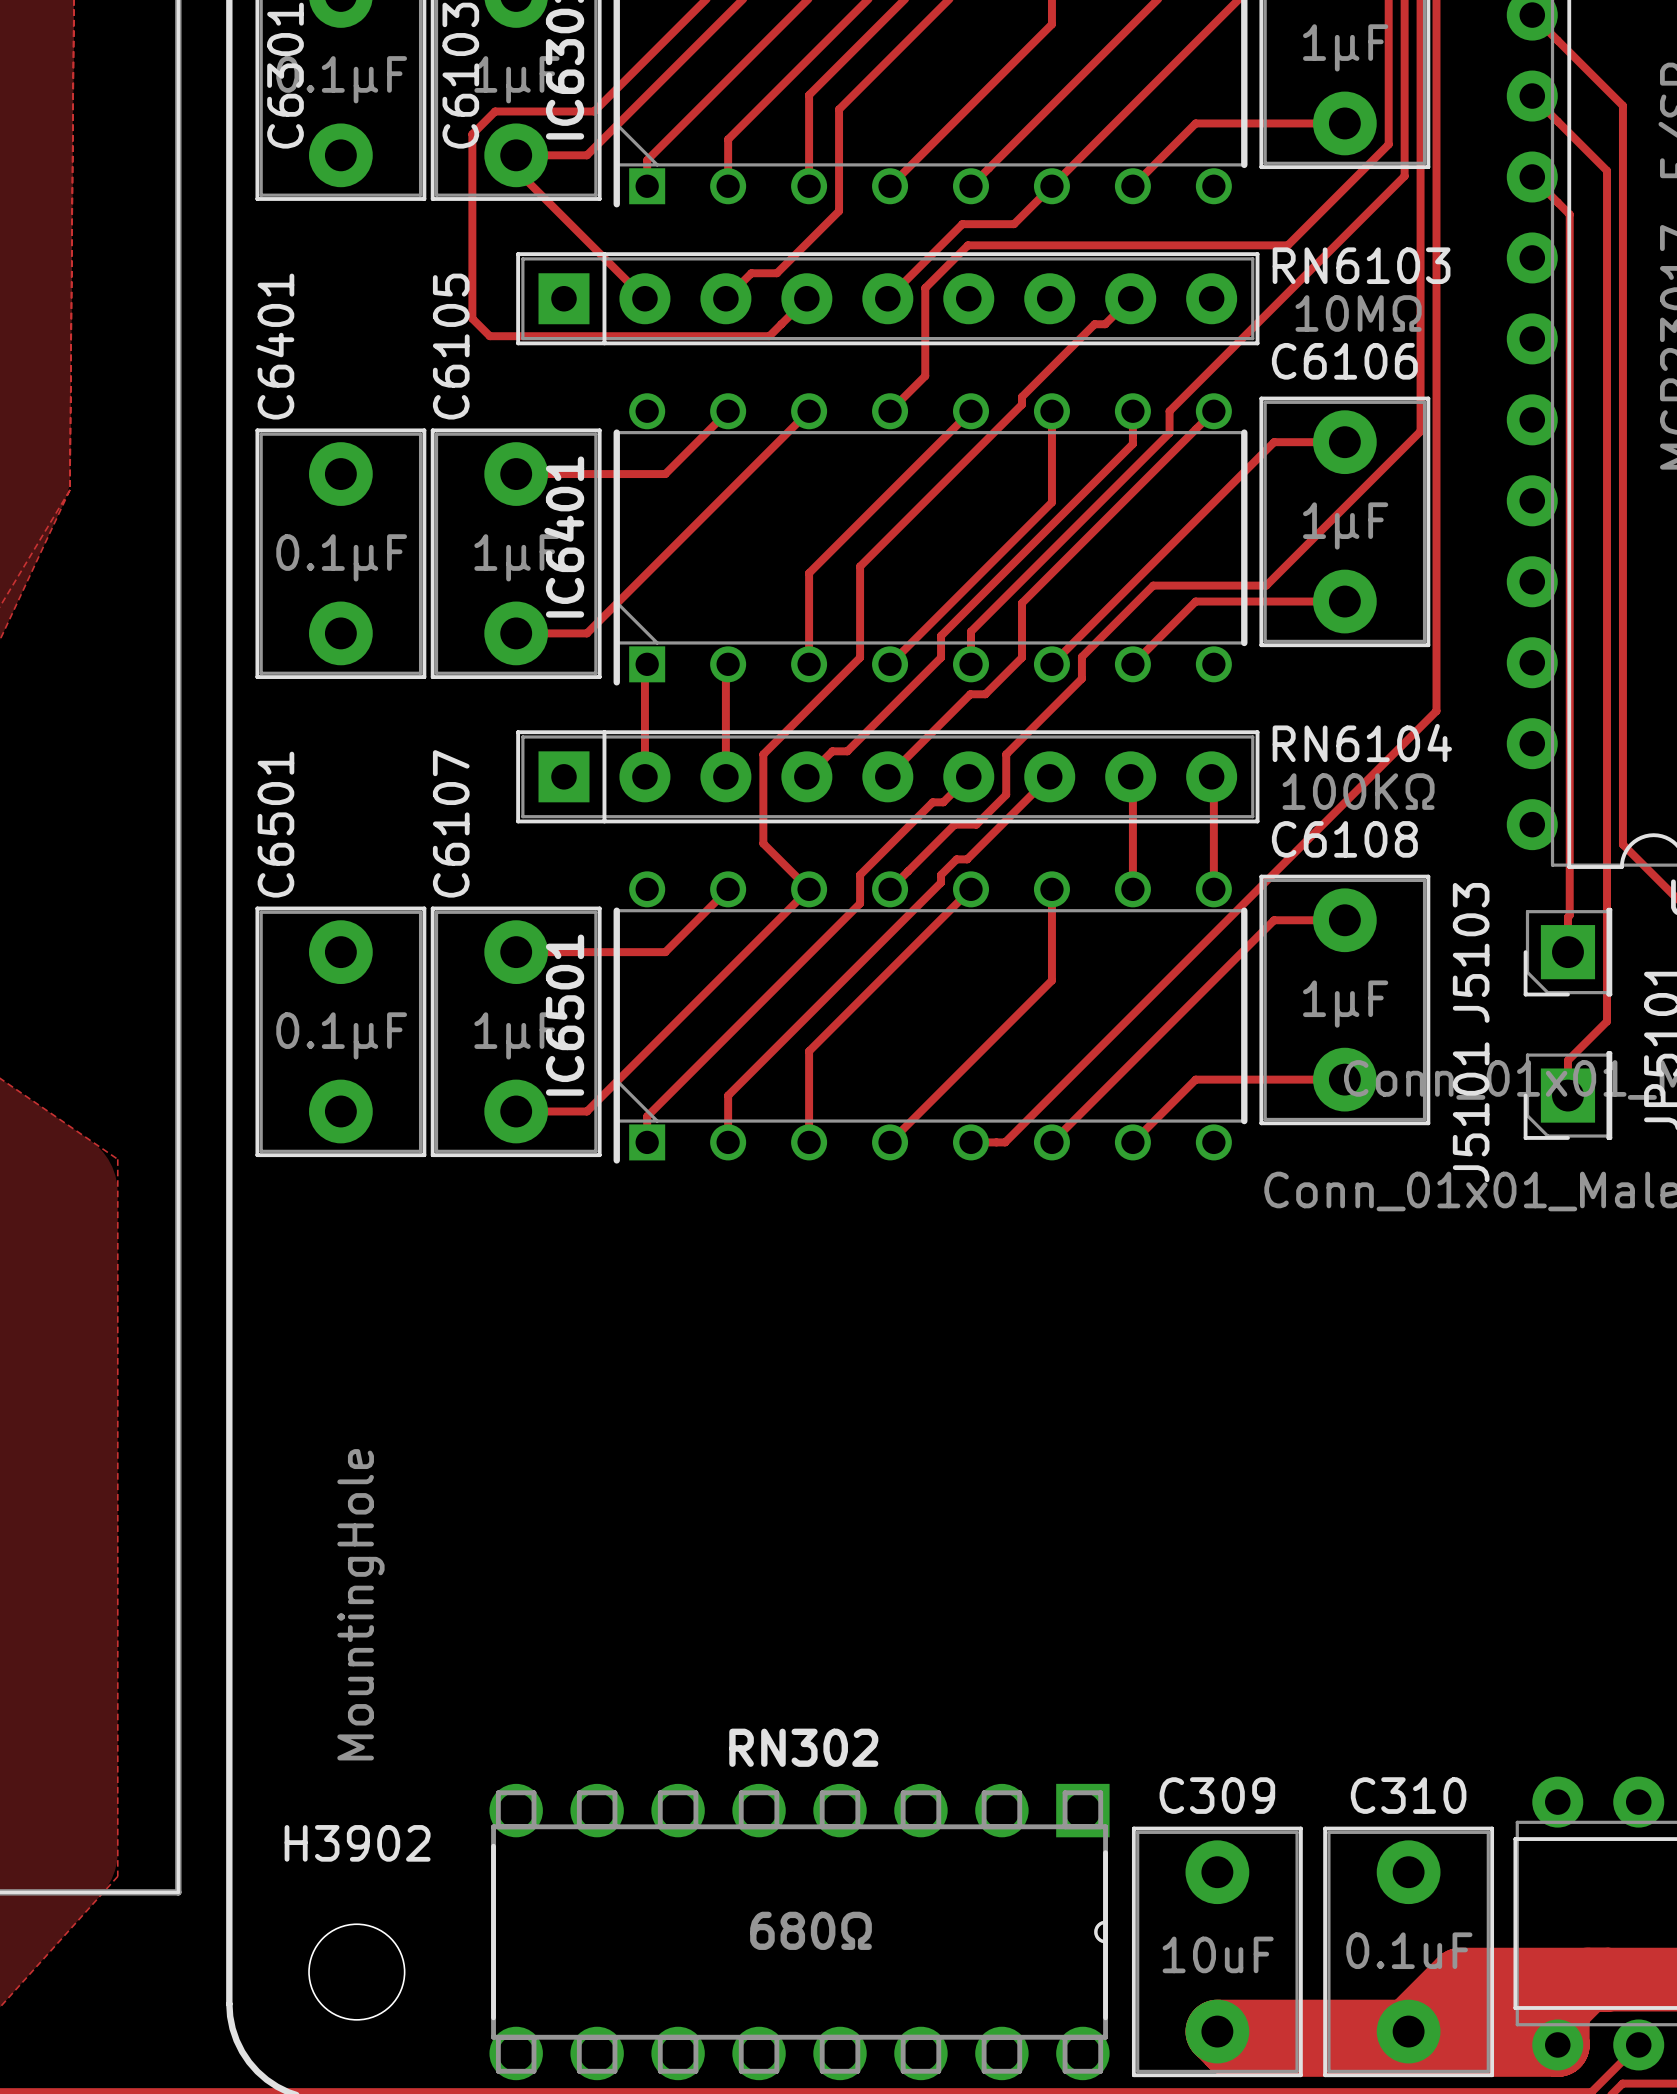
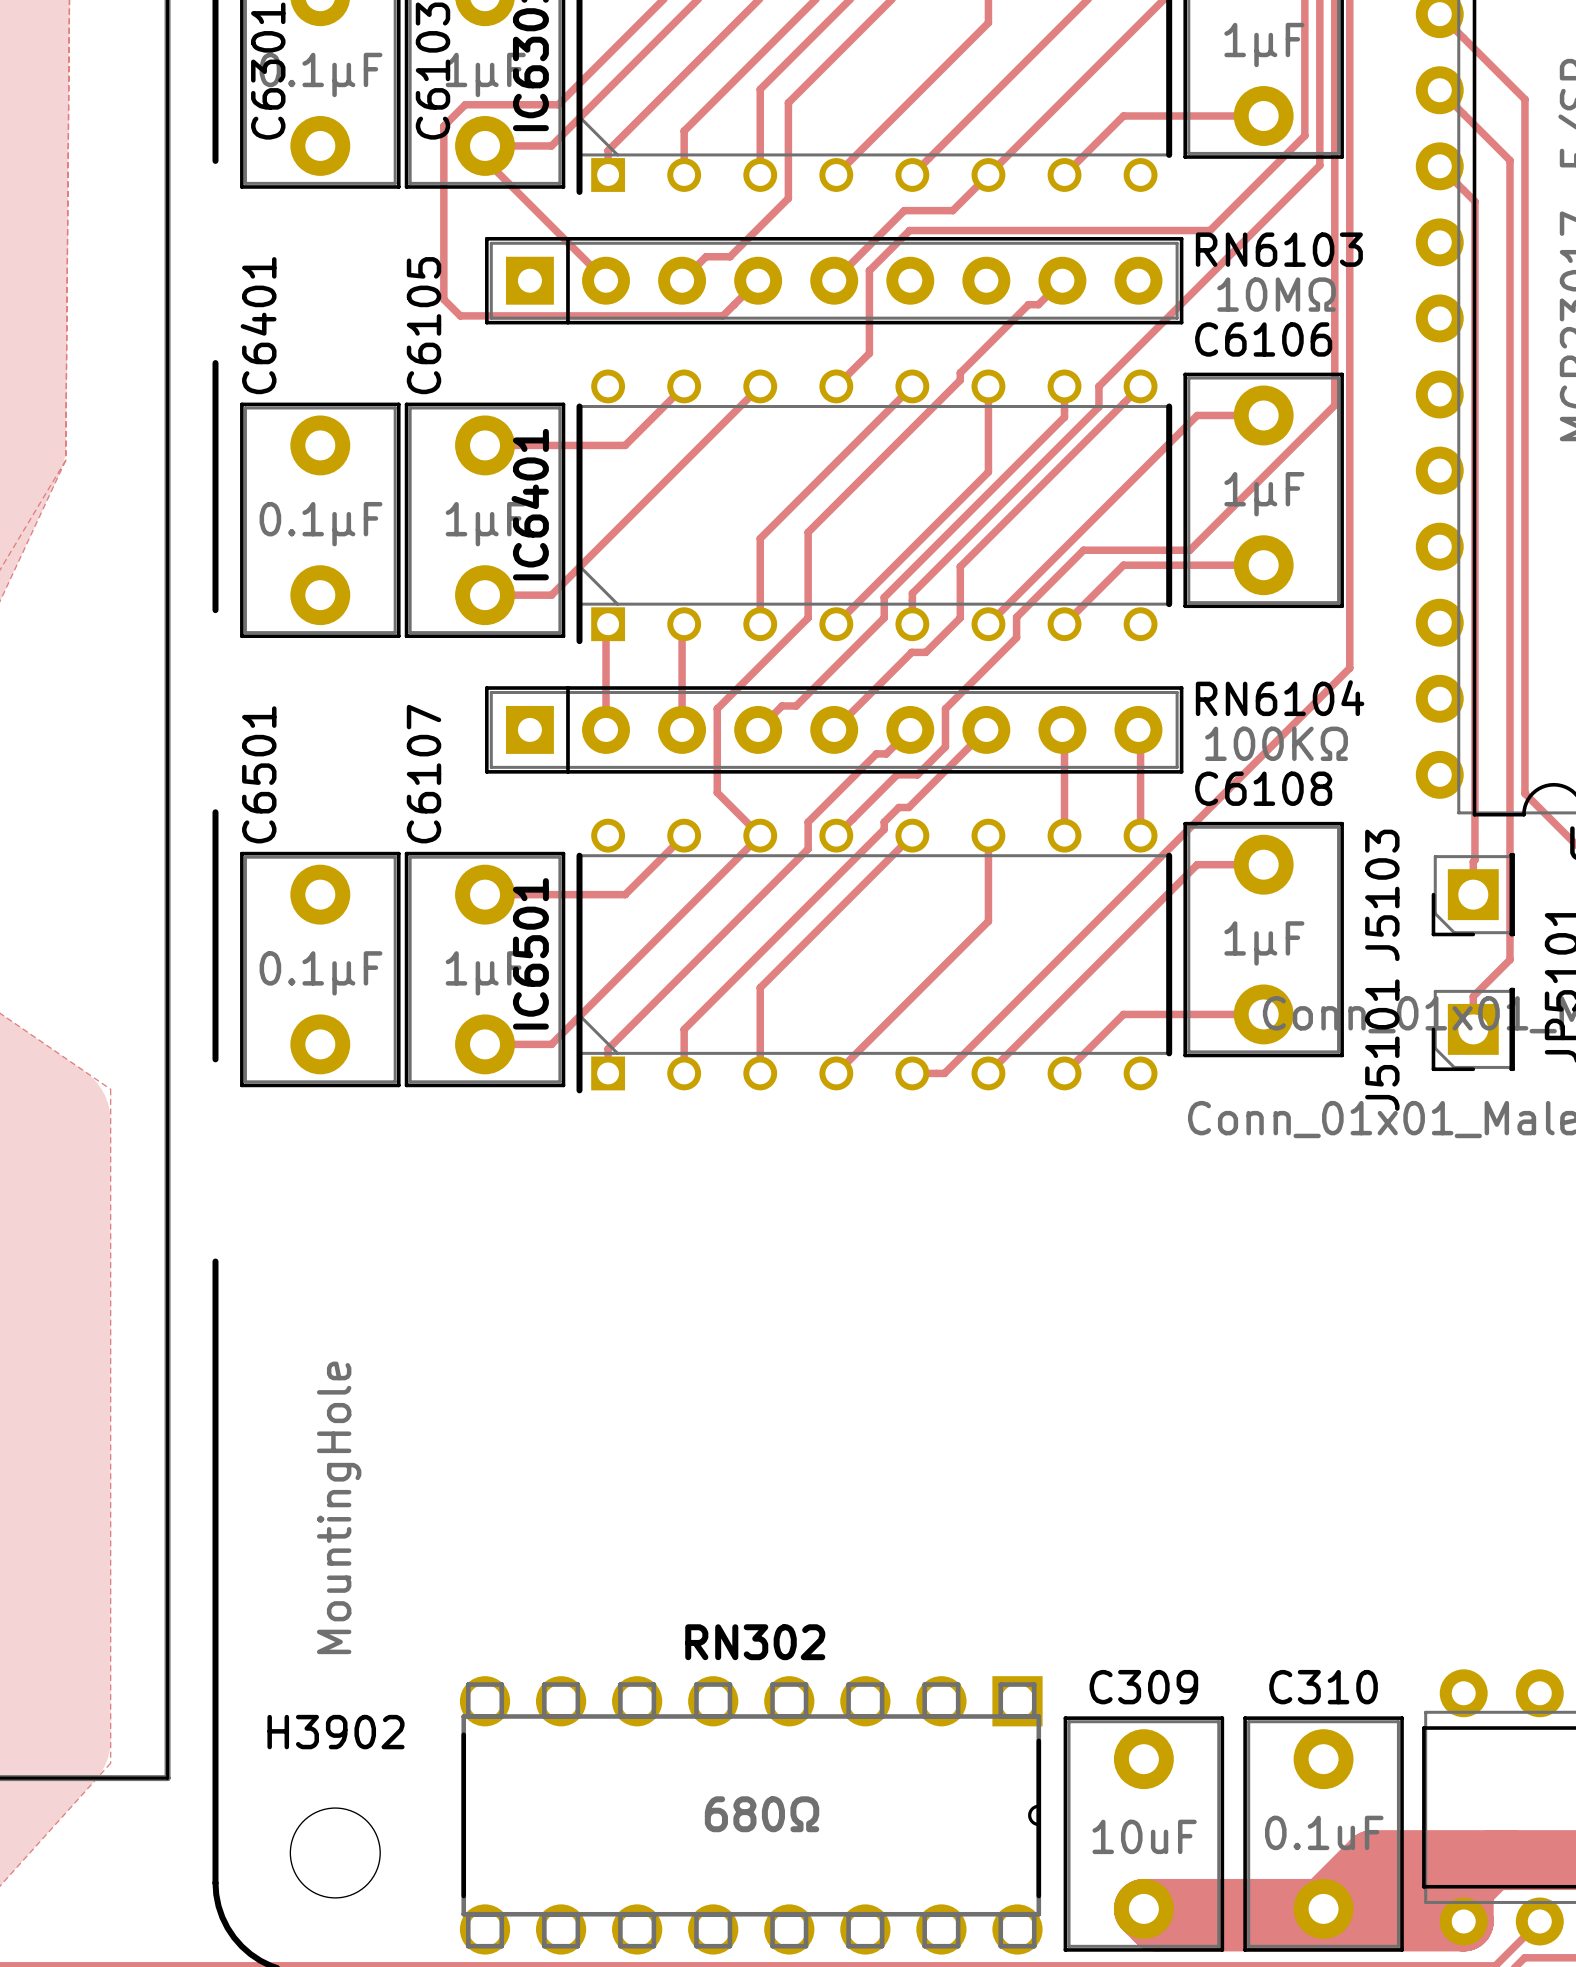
line: (229, 171) (229, 386) -> none
line: (229, 649) (229, 864) -> none
line: (229, 1127) (229, 1342) -> none

